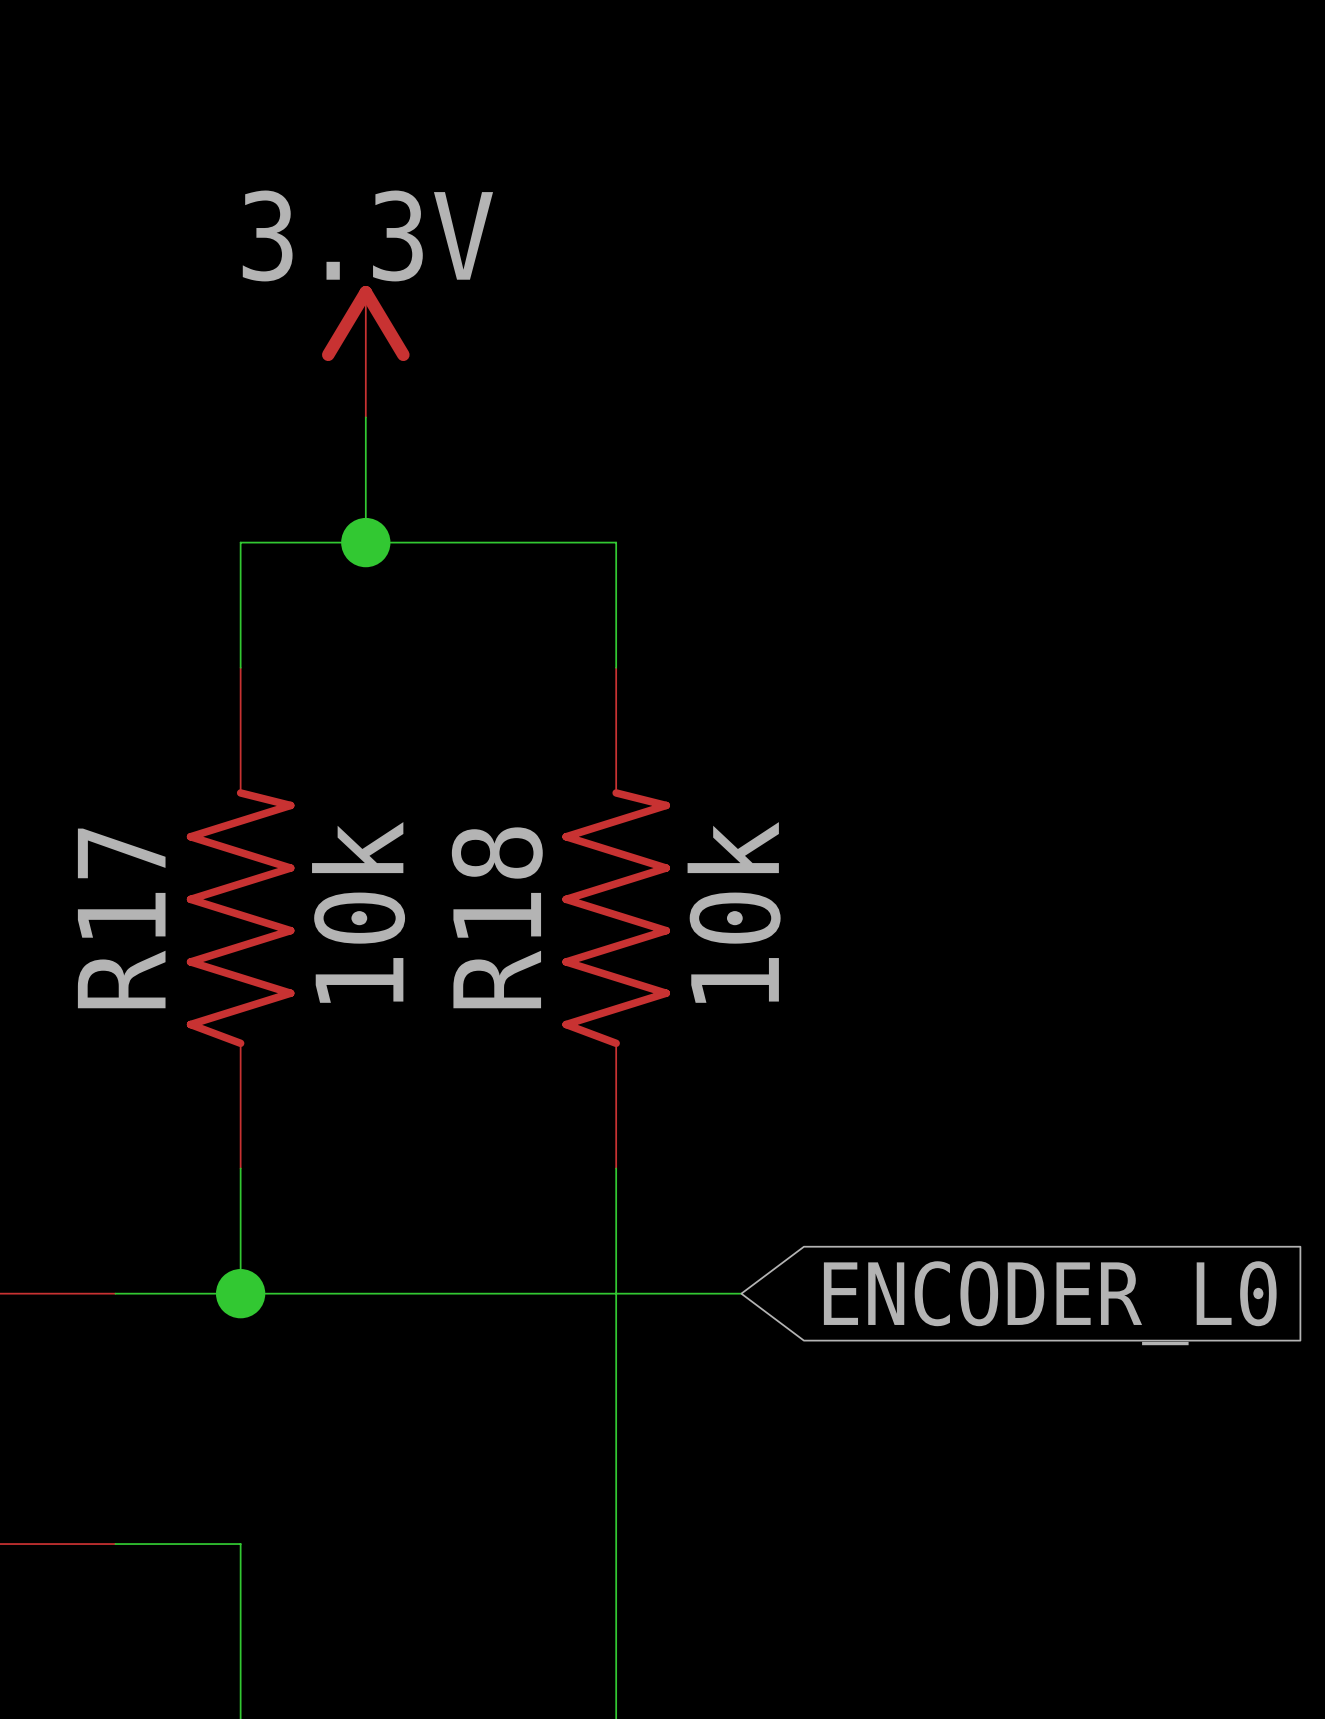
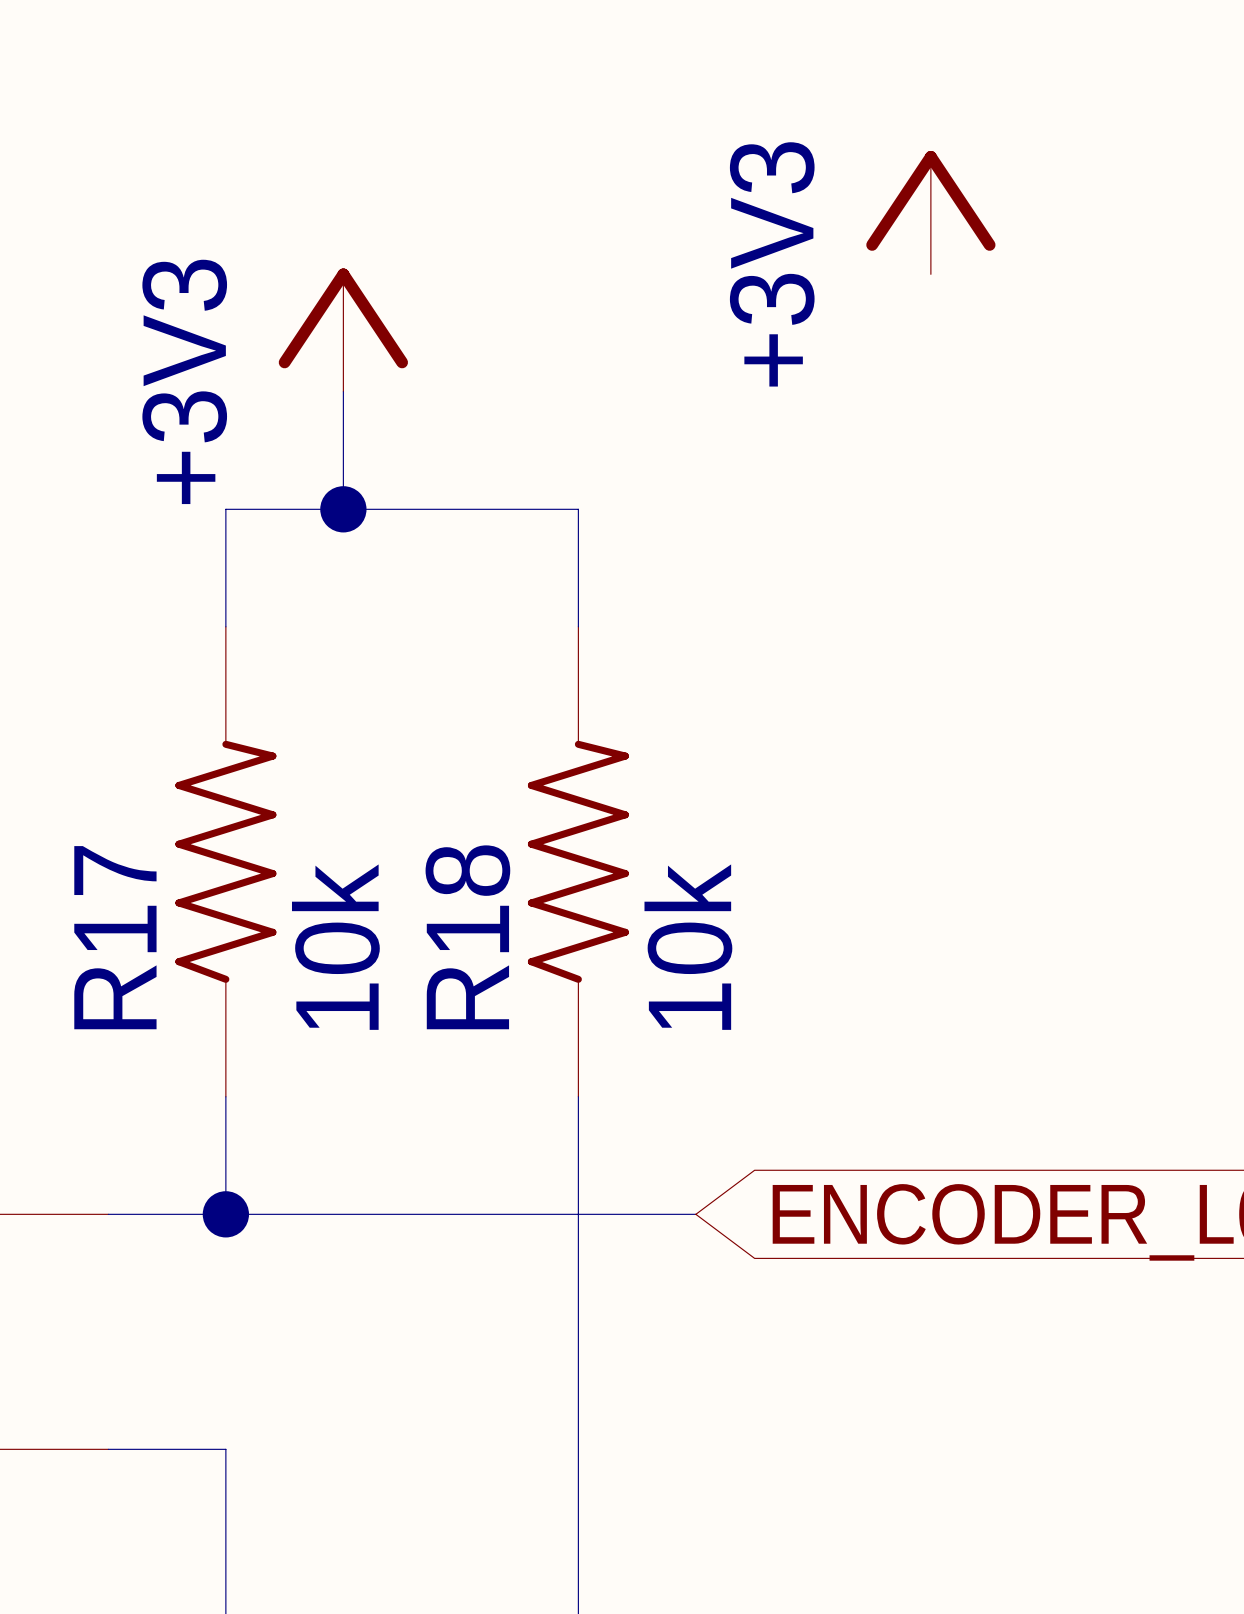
power symbol: none -> +3V3 (930, 212)
power symbol: 3.3V (365, 351) -> +3V3 (343, 330)
R17 value position: 10k (358, 912) -> 10k (335, 947)
R18 value position: 10k (734, 912) -> 10k (688, 947)
R18 name position: R18 (497, 917) -> R18 (467, 937)
R17 name position: R17 (121, 918) -> R17 (115, 937)

